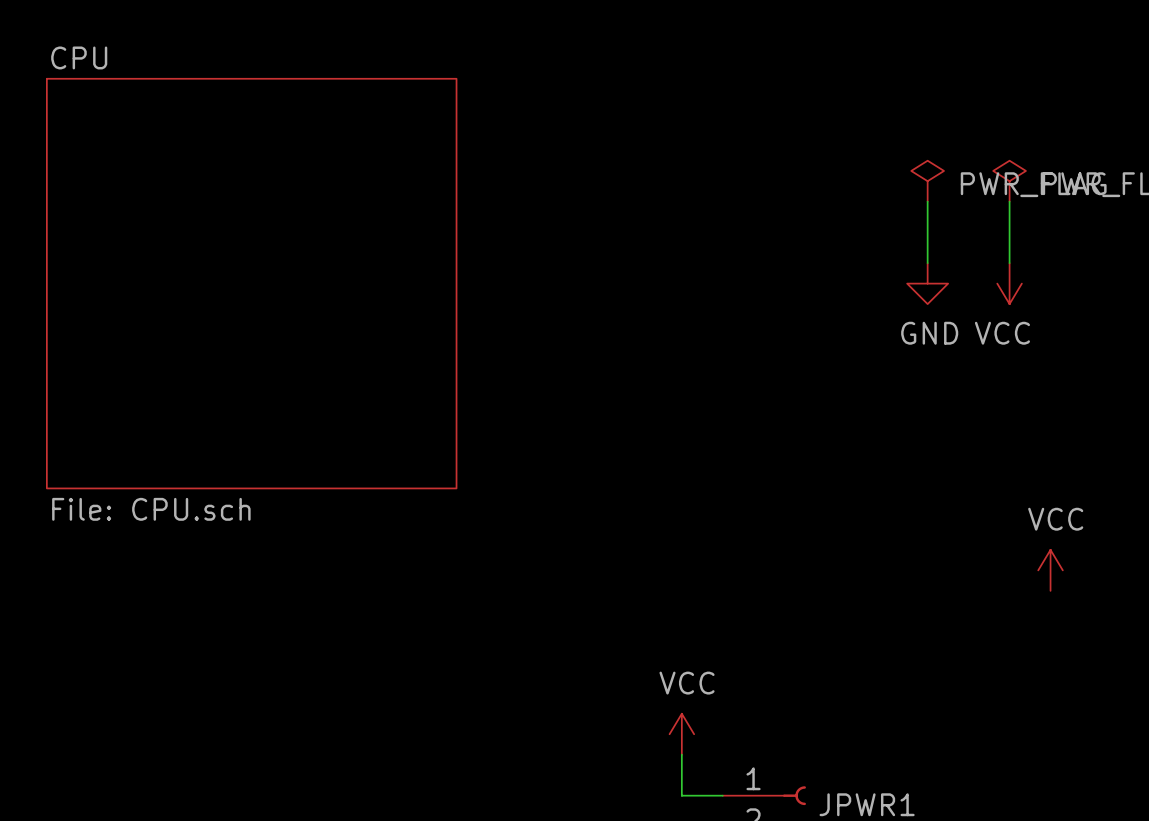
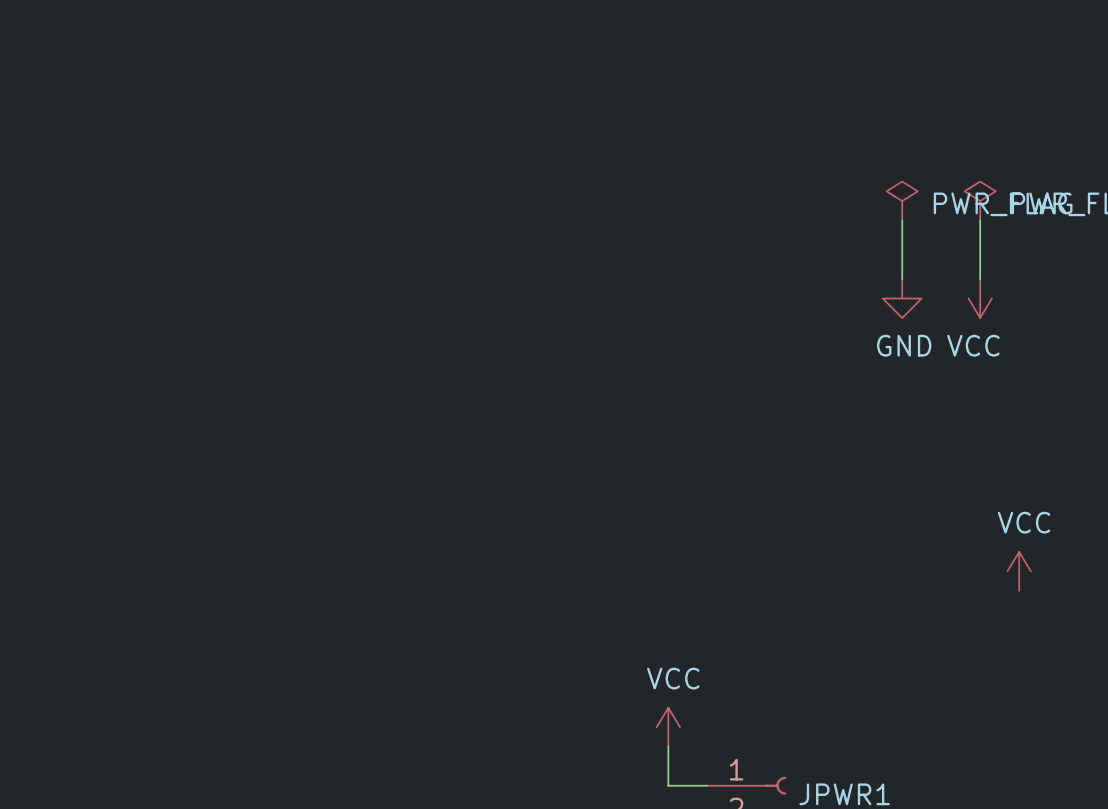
sheet CPU: File: CPU.sch (251, 283) -> none

